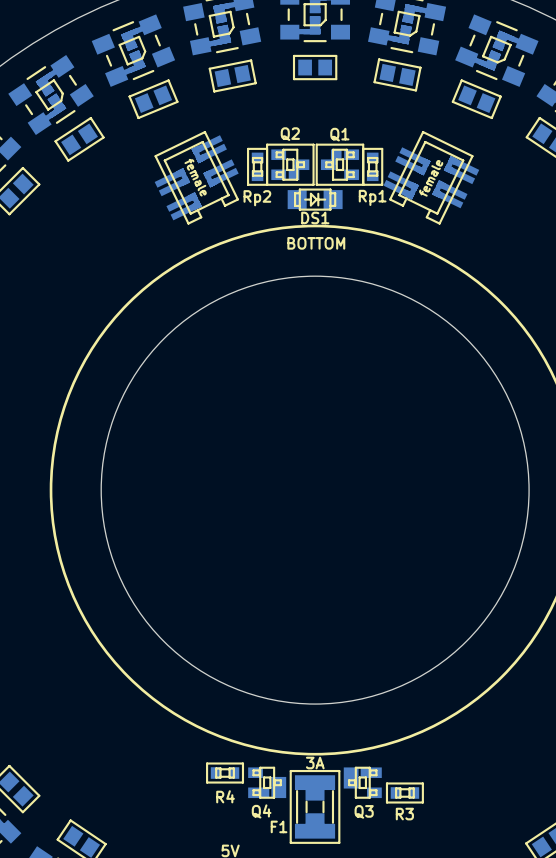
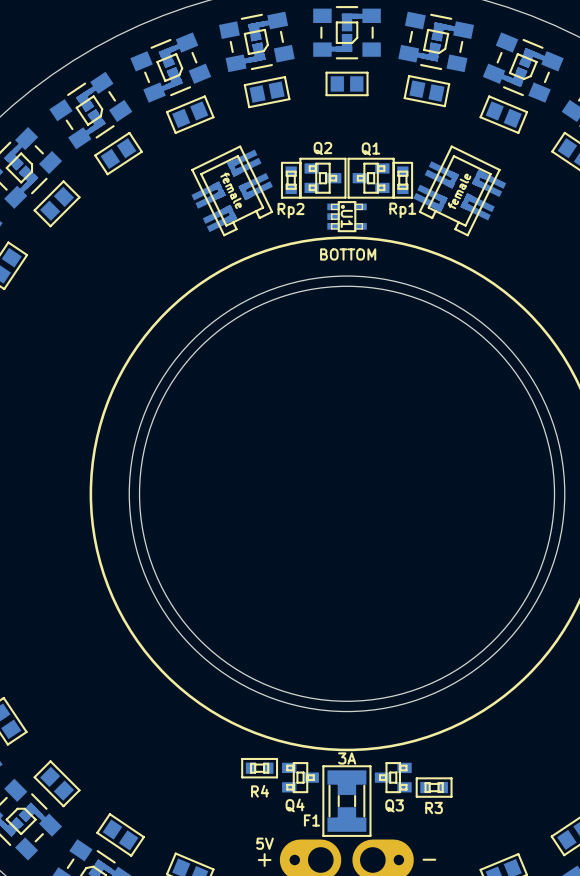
Q2 footprint: [266, 143, 315, 186] -> [299, 157, 347, 199]
Q1 footprint: [315, 143, 365, 186] -> [347, 157, 395, 199]
DS1: (315, 199) -> none
U1: none -> (347, 216)
round board edge: none -> [128, 275, 566, 713]
Q4 footprint: [248, 766, 287, 799] -> [282, 762, 319, 794]
Q3 footprint: [343, 766, 382, 799] -> [374, 762, 412, 794]

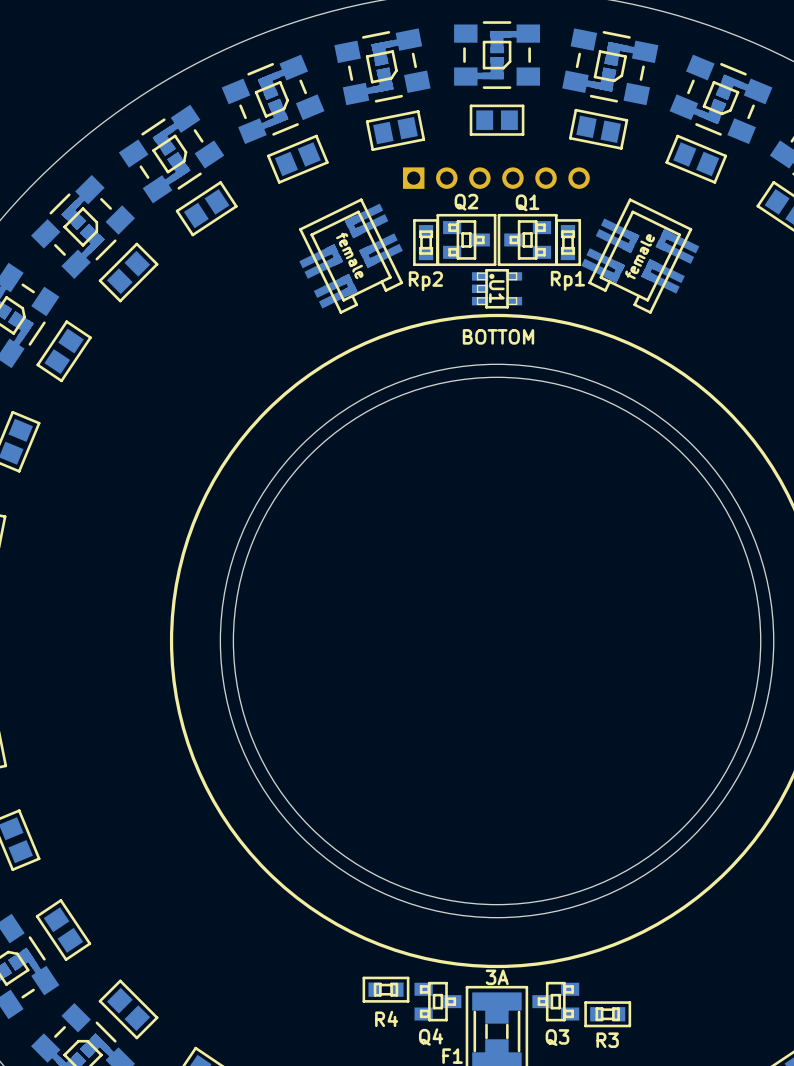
part: none -> (496, 178)

